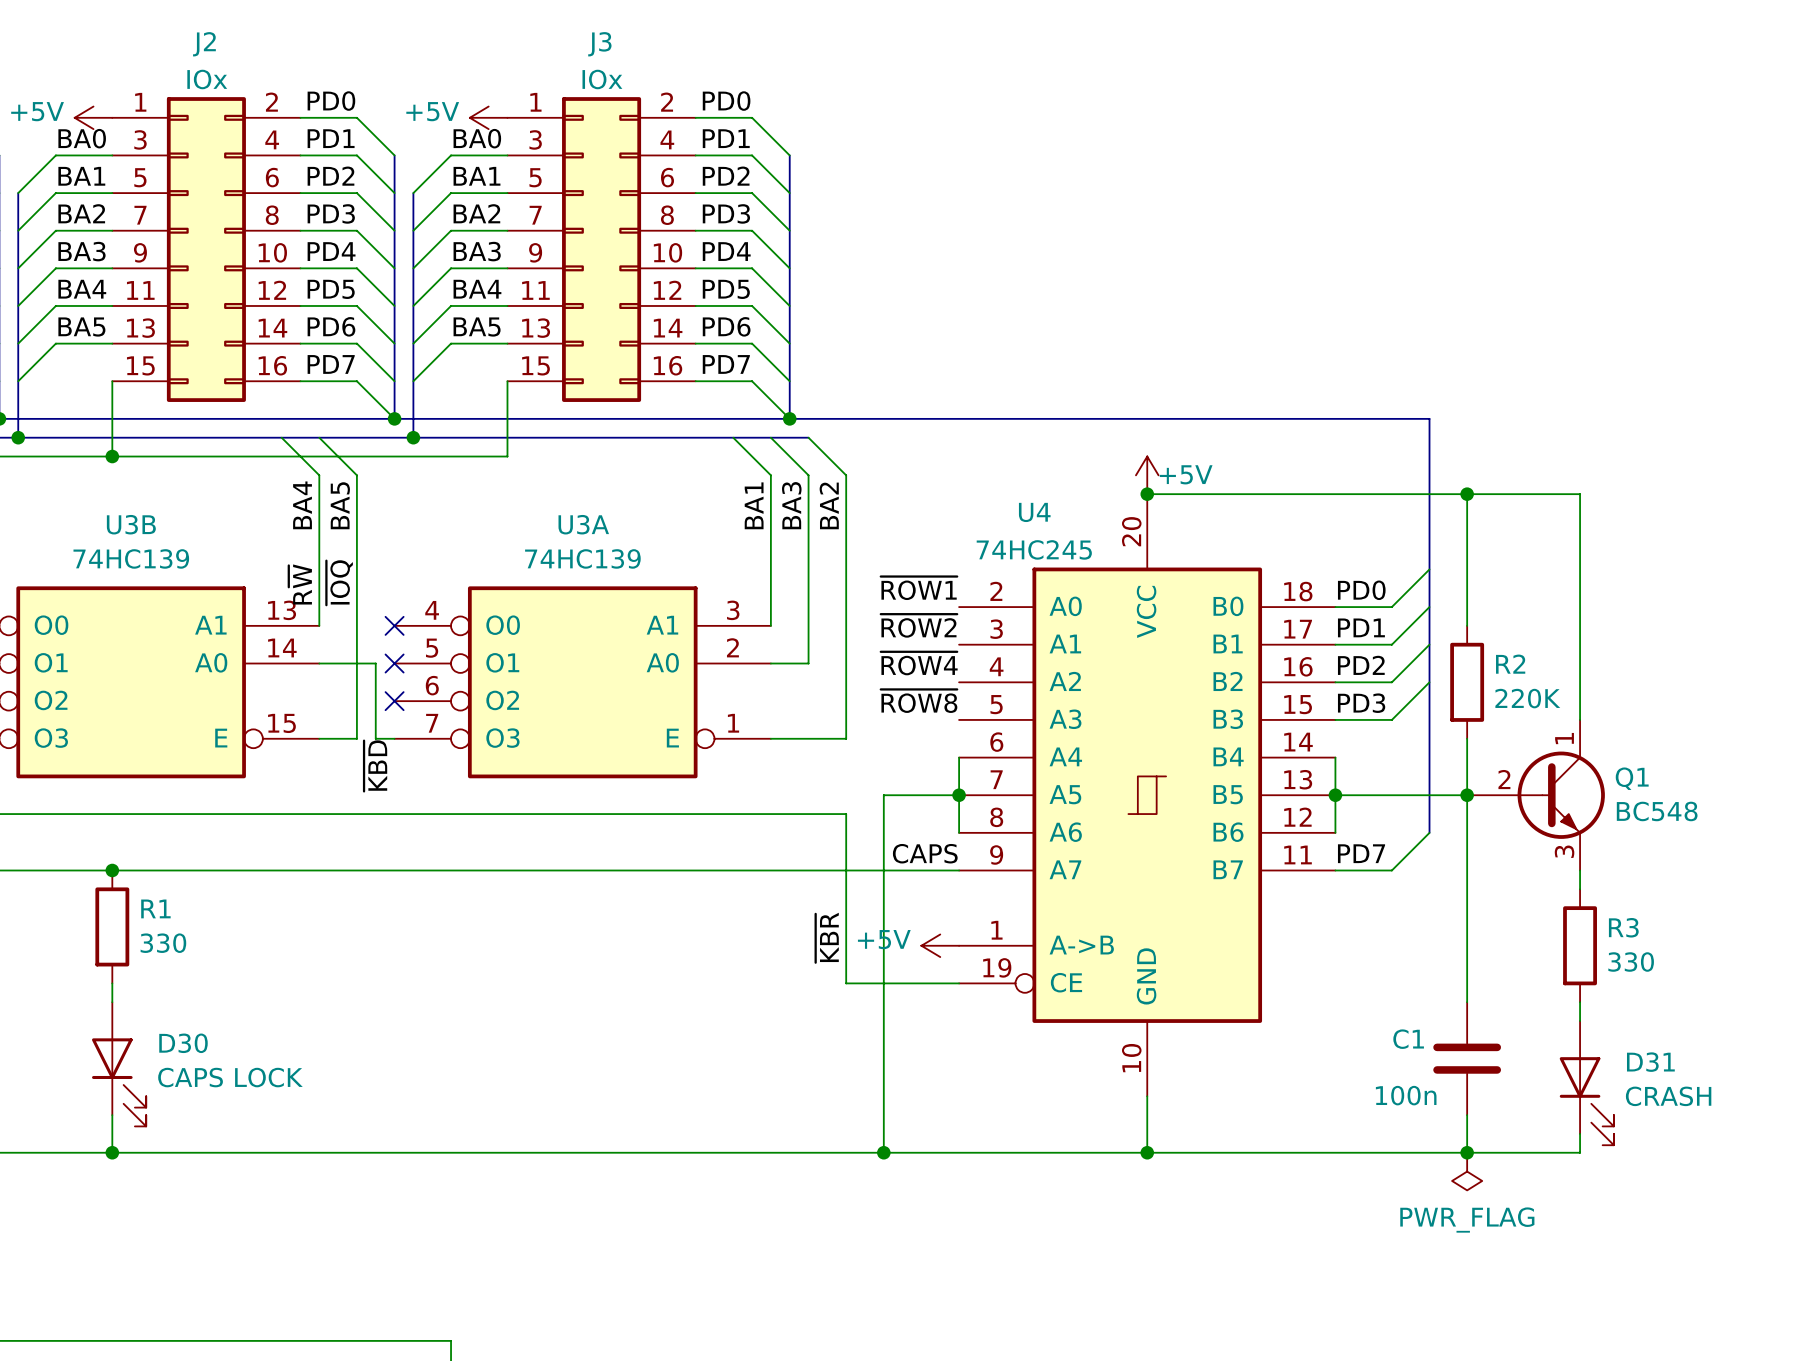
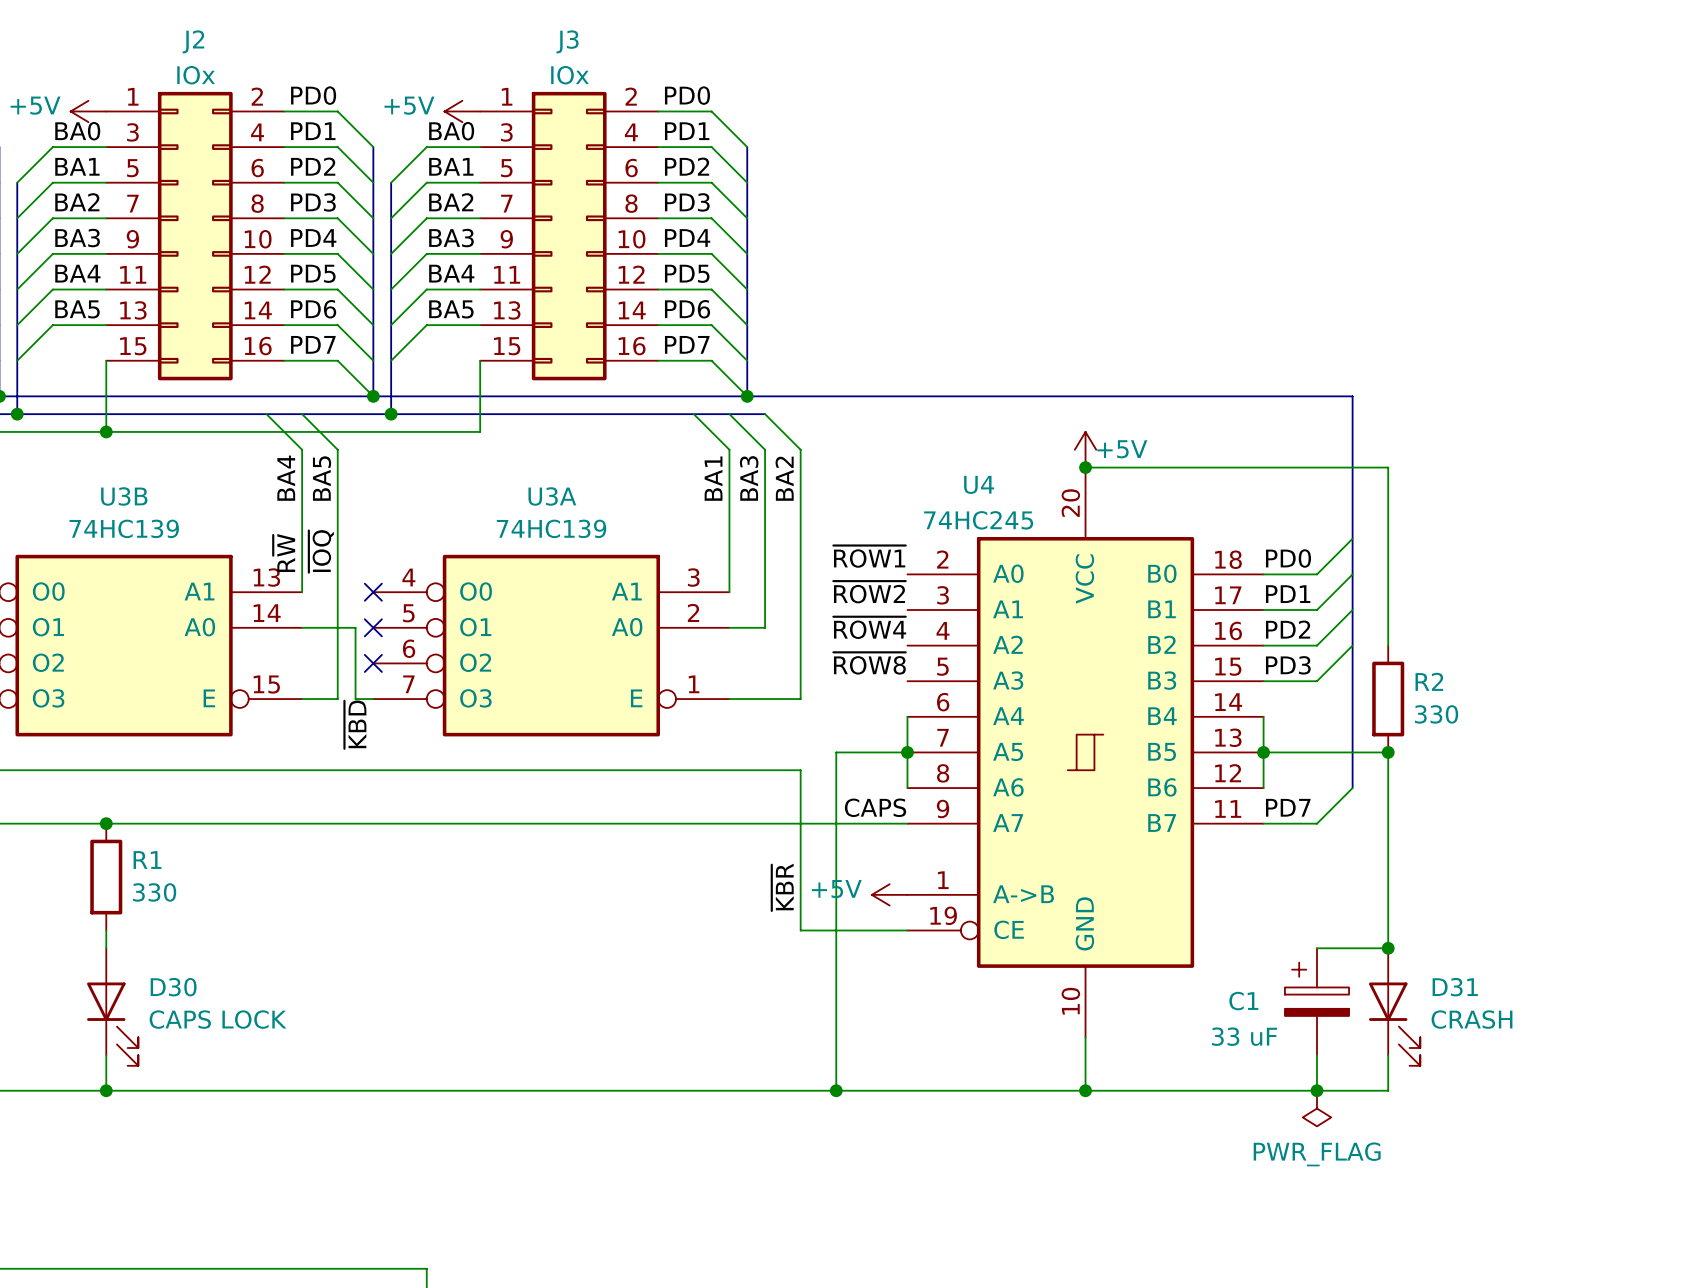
wire: (1467, 494) (1580, 494) (1580, 719) -> none
junction: (1467, 494) -> none
R2 position: (1467, 682) -> (1388, 699)
R2 value: 220K (1527, 698) -> 330 (1436, 714)
wire: (1467, 738) (1467, 795) -> (1388, 592) (1388, 645)
Q1: BC548 (1536, 795) -> none
wire: (1580, 870) (1580, 889) -> none
R3: 330 (1580, 945) -> none
wire: none -> (1316, 948) (1388, 948)
C1 symbol: [1433, 1002, 1502, 1116] -> [1284, 948, 1350, 1056]
junction: none -> (1388, 948)
wire: (1580, 1002) (1580, 1021) -> none
D31 position: (1586, 1083) -> (1394, 1007)
C1 value: 100n (1406, 1095) -> 33 uF (1244, 1036)
wire: none -> (1316, 1055) (1316, 1090)
wire: (1580, 1133) (1580, 1152) (1467, 1152) -> none
junction: none -> (1316, 1090)
junction: (1467, 1152) -> none
power symbol position: PWR_FLAG (1467, 1171) -> PWR_FLAG (1316, 1108)

